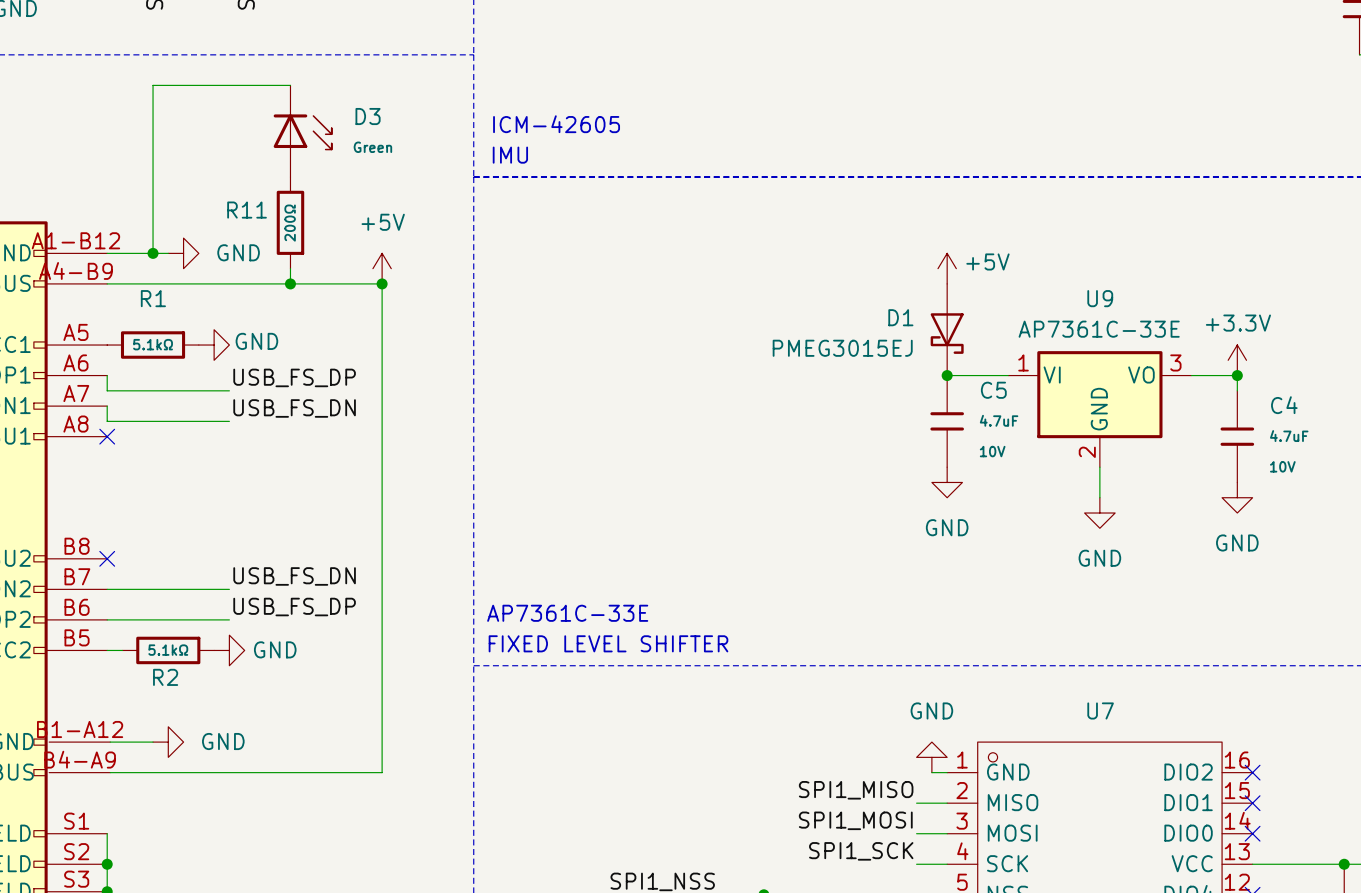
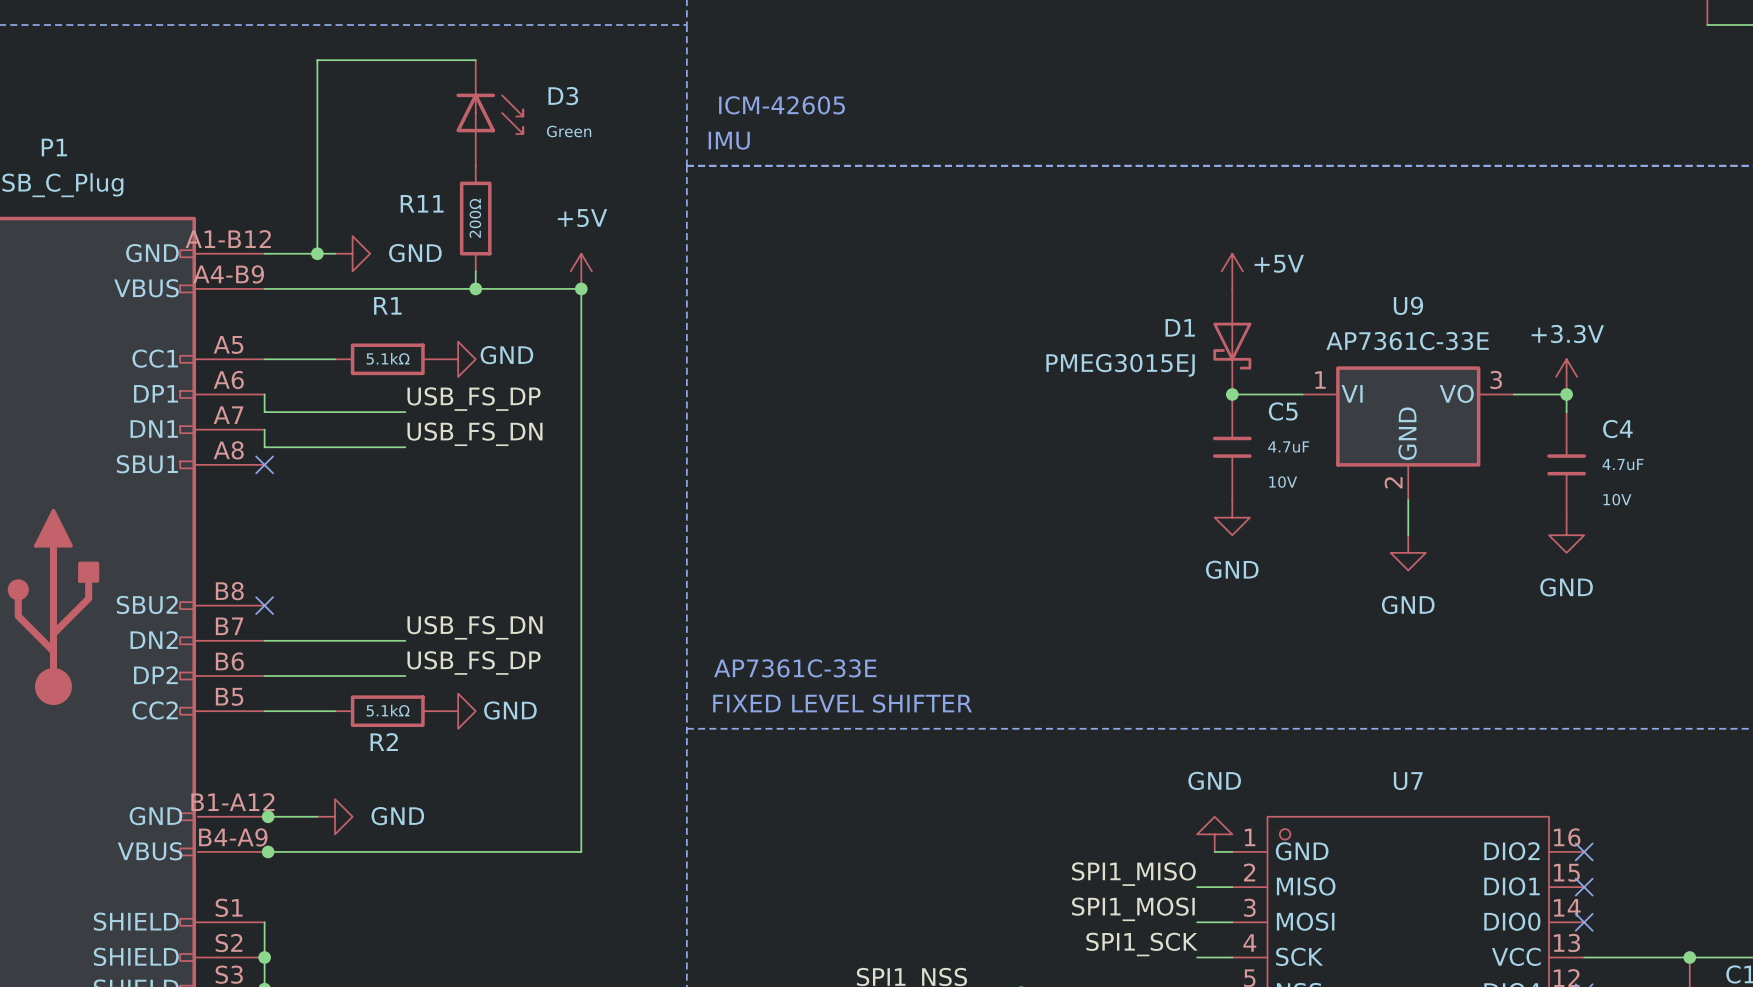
wire: none -> (264, 359) (334, 359)
R1 position: (153, 345) -> (387, 359)
power symbol position: GND (214, 345) -> GND (458, 359)
wire: none -> (282, 711) (334, 711)
R2 position: (168, 650) -> (387, 711)
power symbol position: GND (229, 650) -> GND (458, 711)
junction: none -> (268, 816)
junction: none -> (268, 851)

